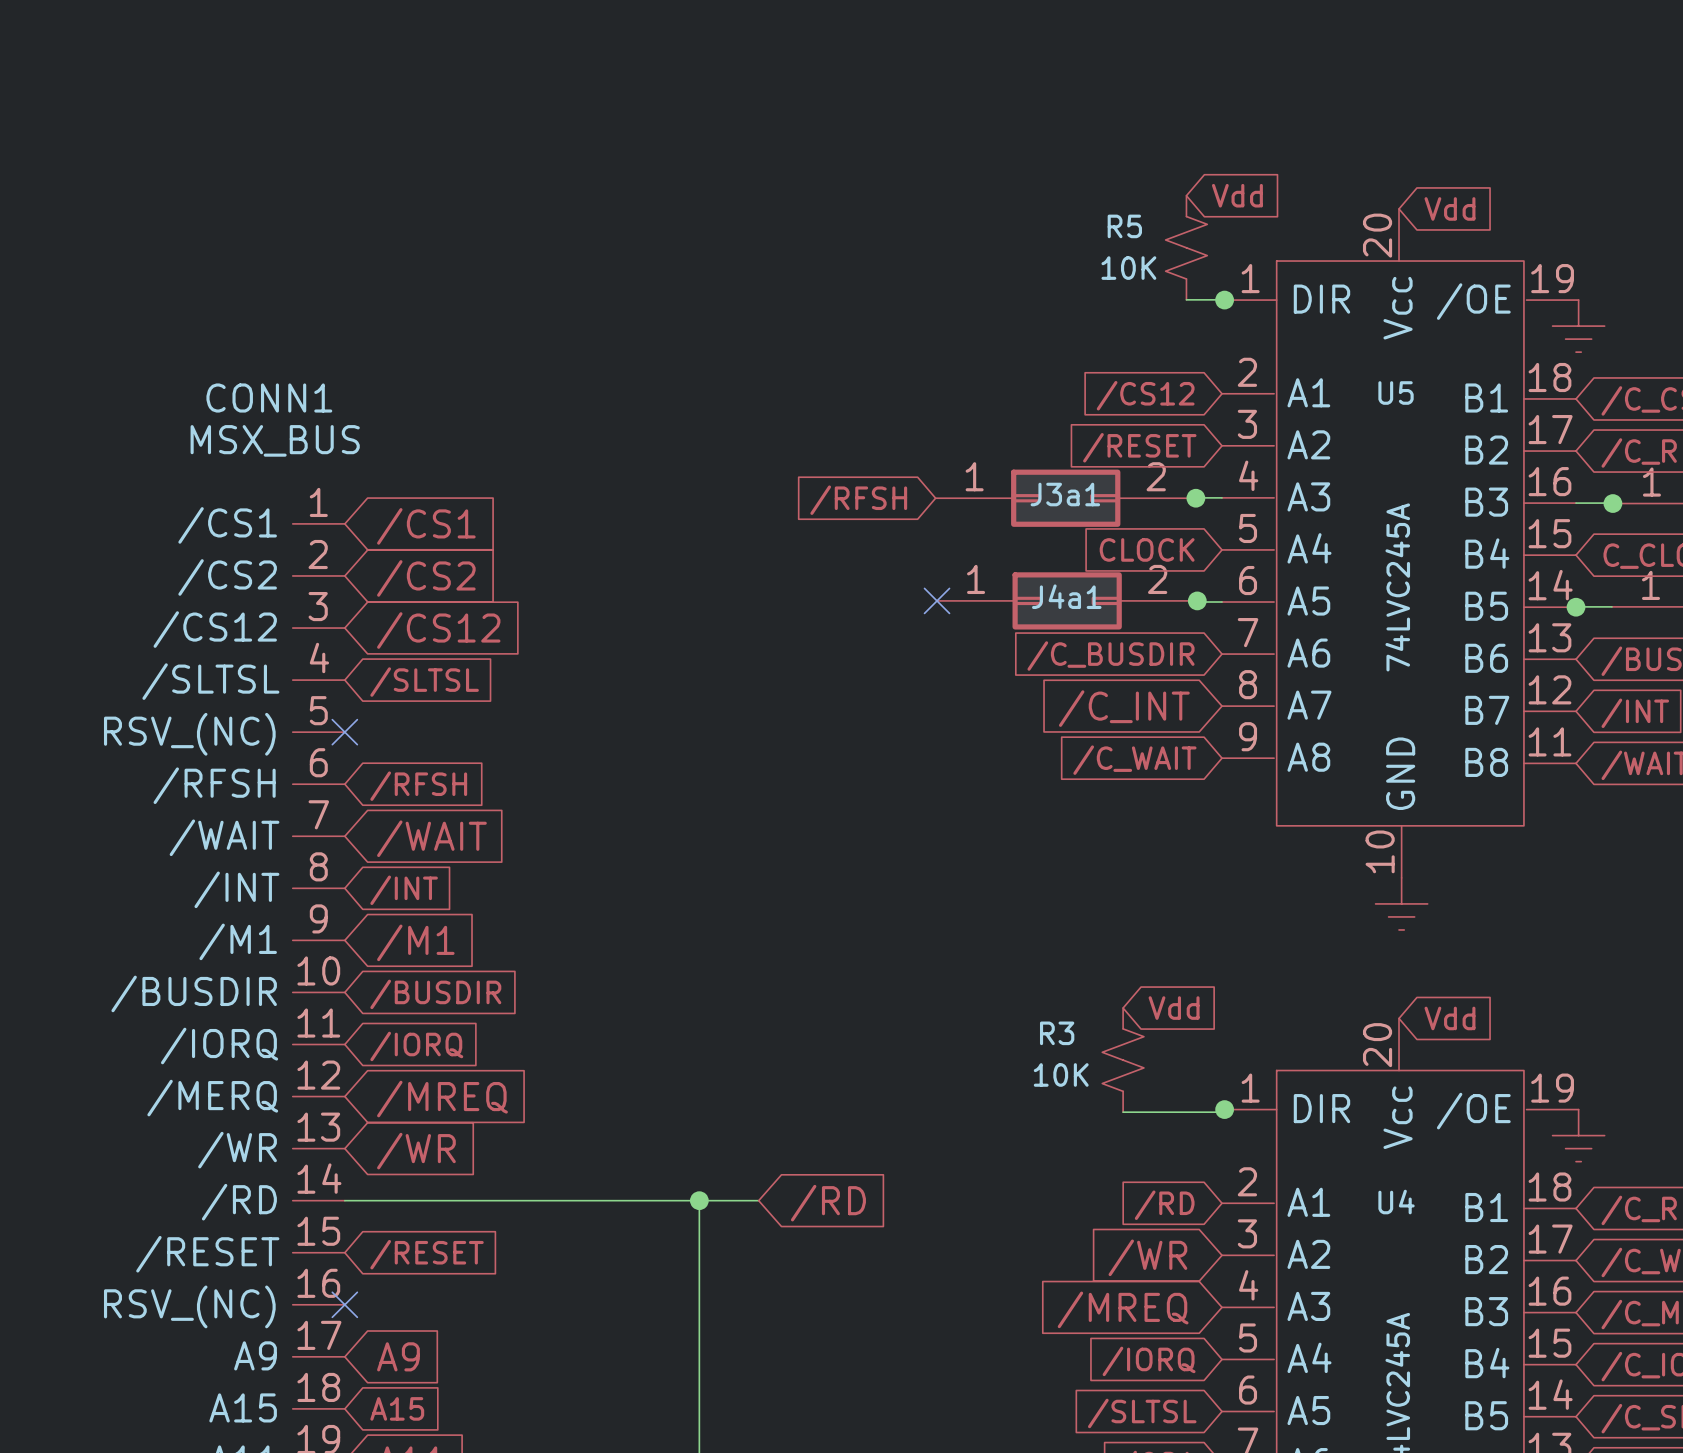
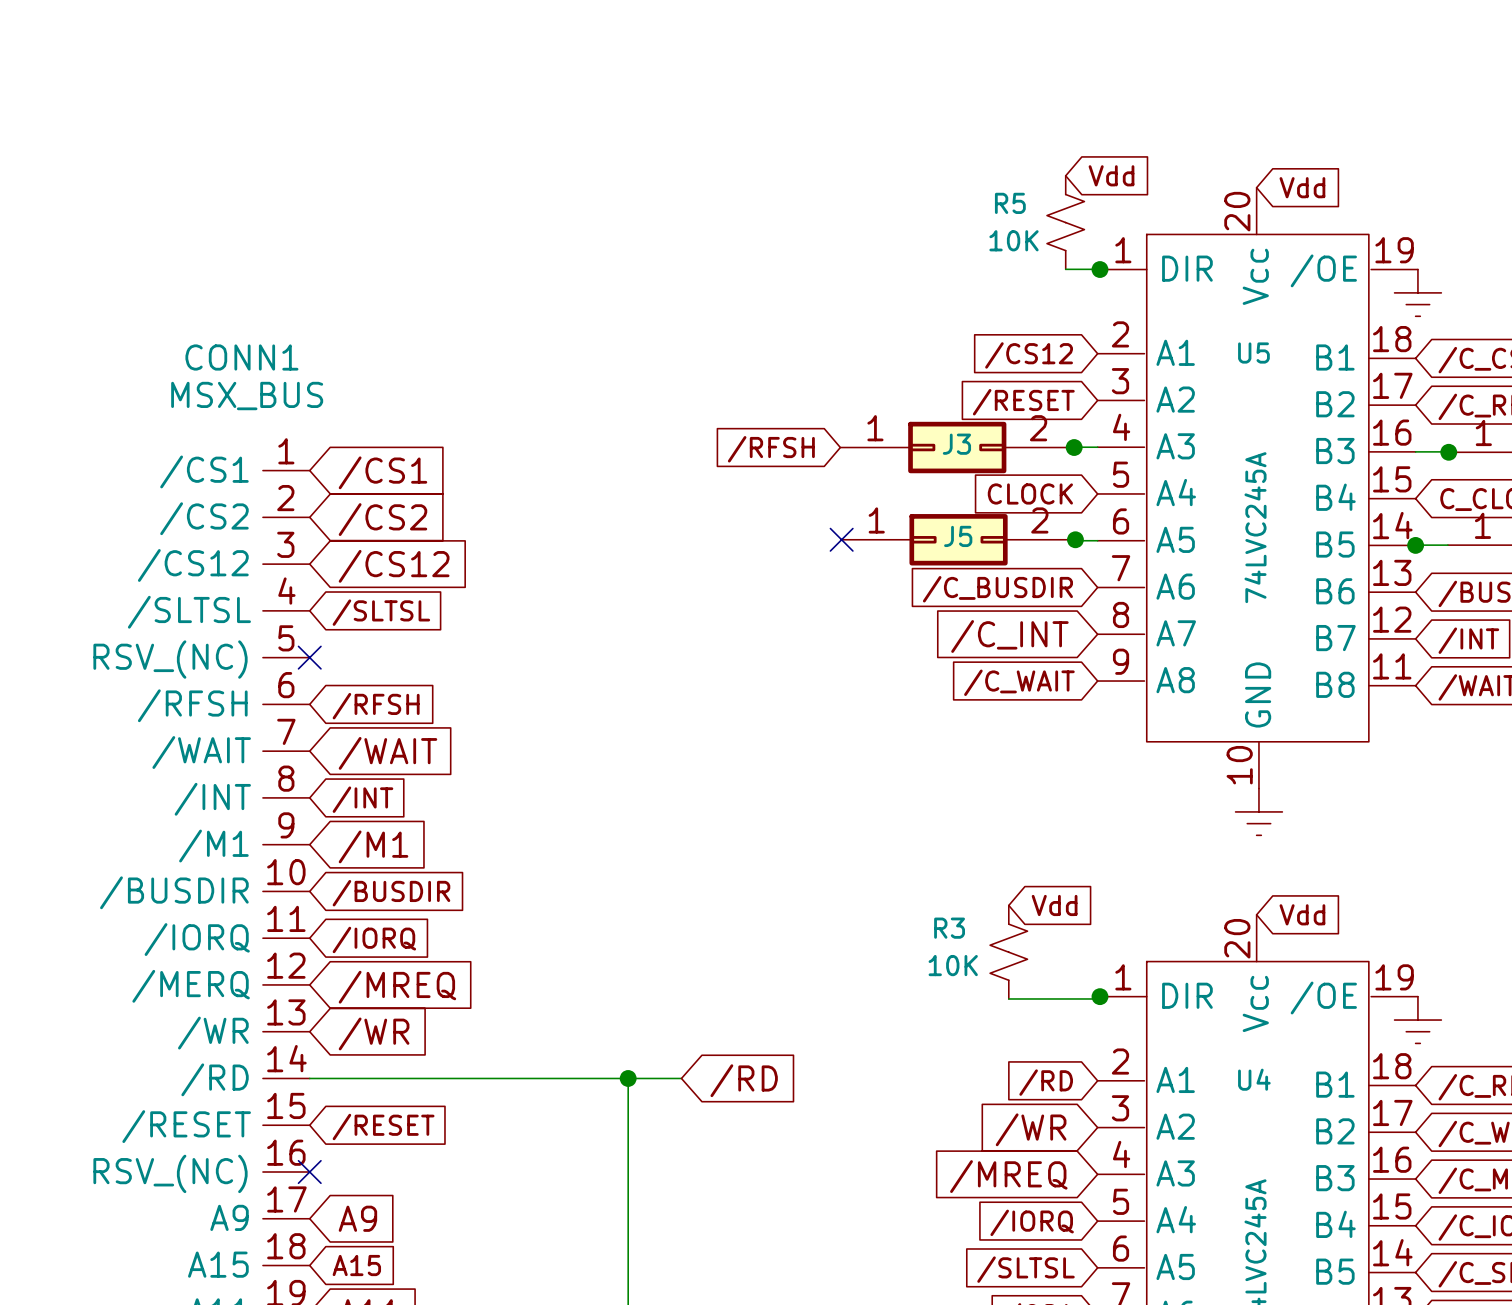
J3a1 name: J3a1 (1065, 494) -> J3 (956, 444)
J4a1 name: J4a1 (1066, 596) -> J5 (958, 536)

